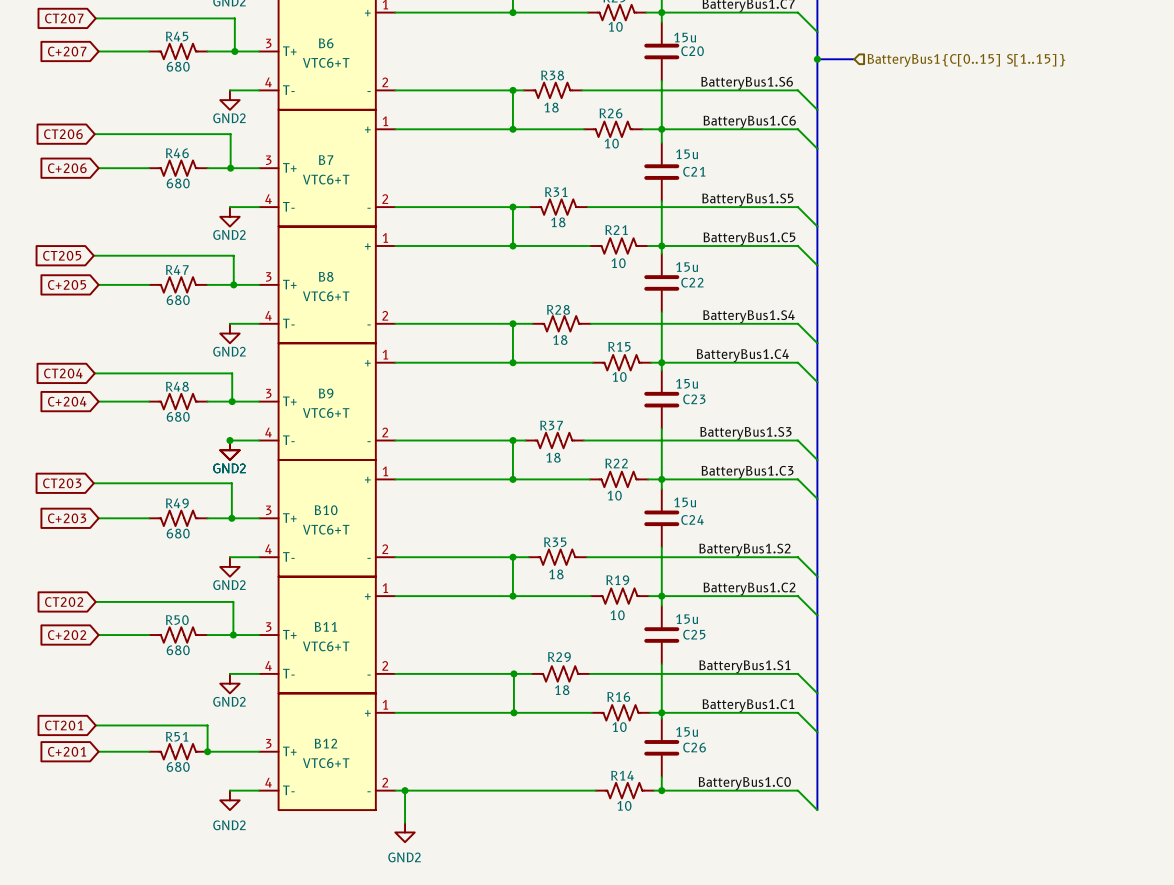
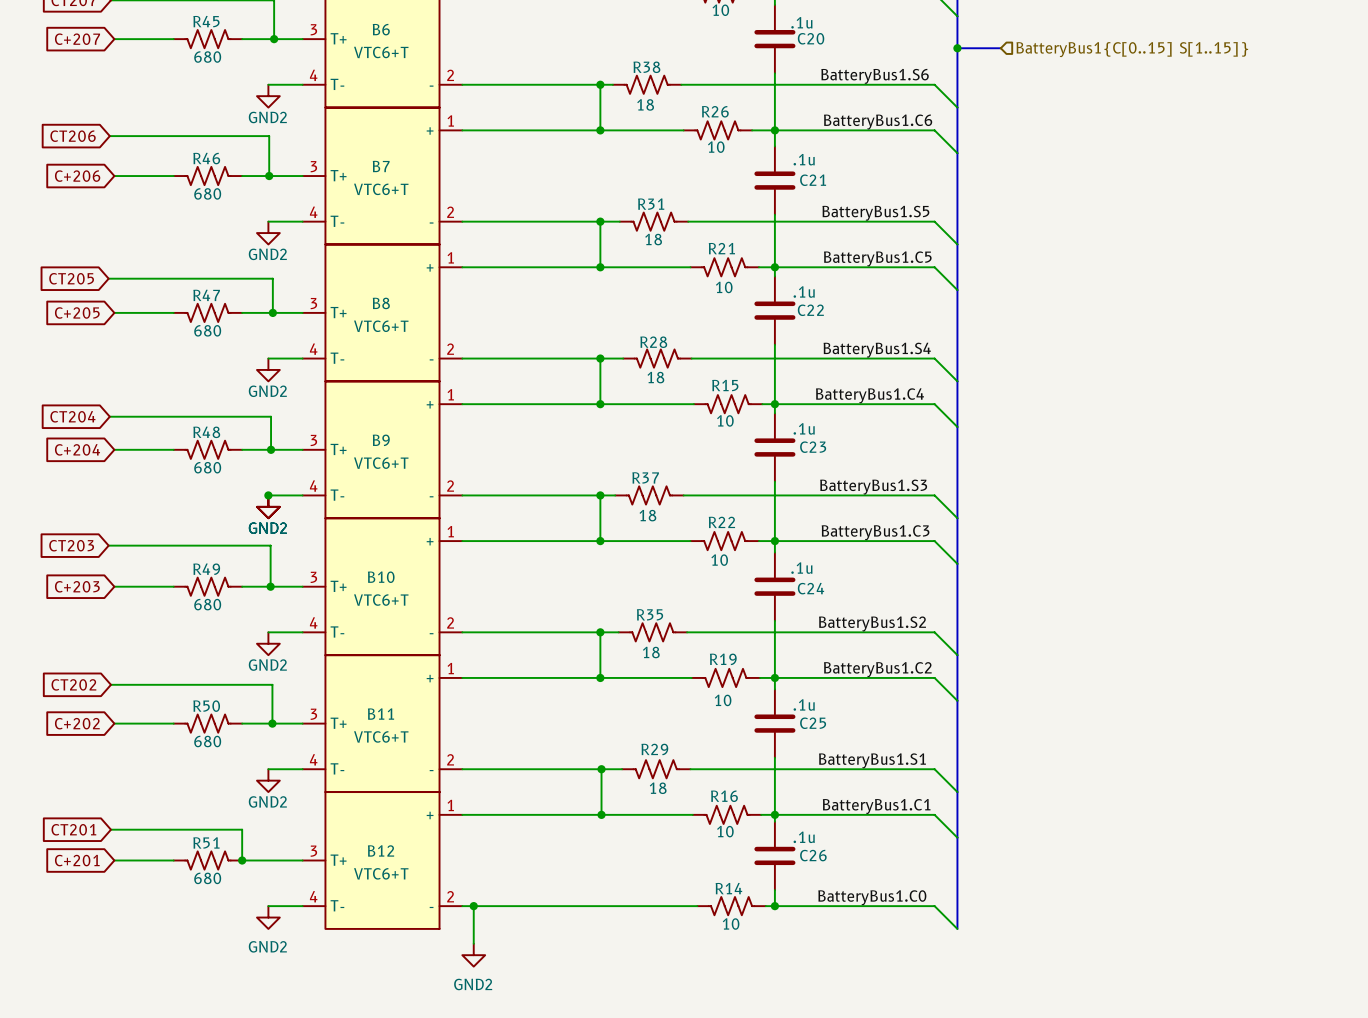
C20 value: 15u (685, 37) -> .1u (801, 22)
C21 value: 15u (687, 154) -> .1u (804, 159)
C22 value: 15u (687, 267) -> .1u (804, 292)
C23 value: 15u (687, 383) -> .1u (804, 428)
C24 value: 15u (685, 502) -> .1u (801, 568)
C25 value: 15u (687, 619) -> .1u (804, 704)
C26 value: 15u (687, 731) -> .1u (804, 837)

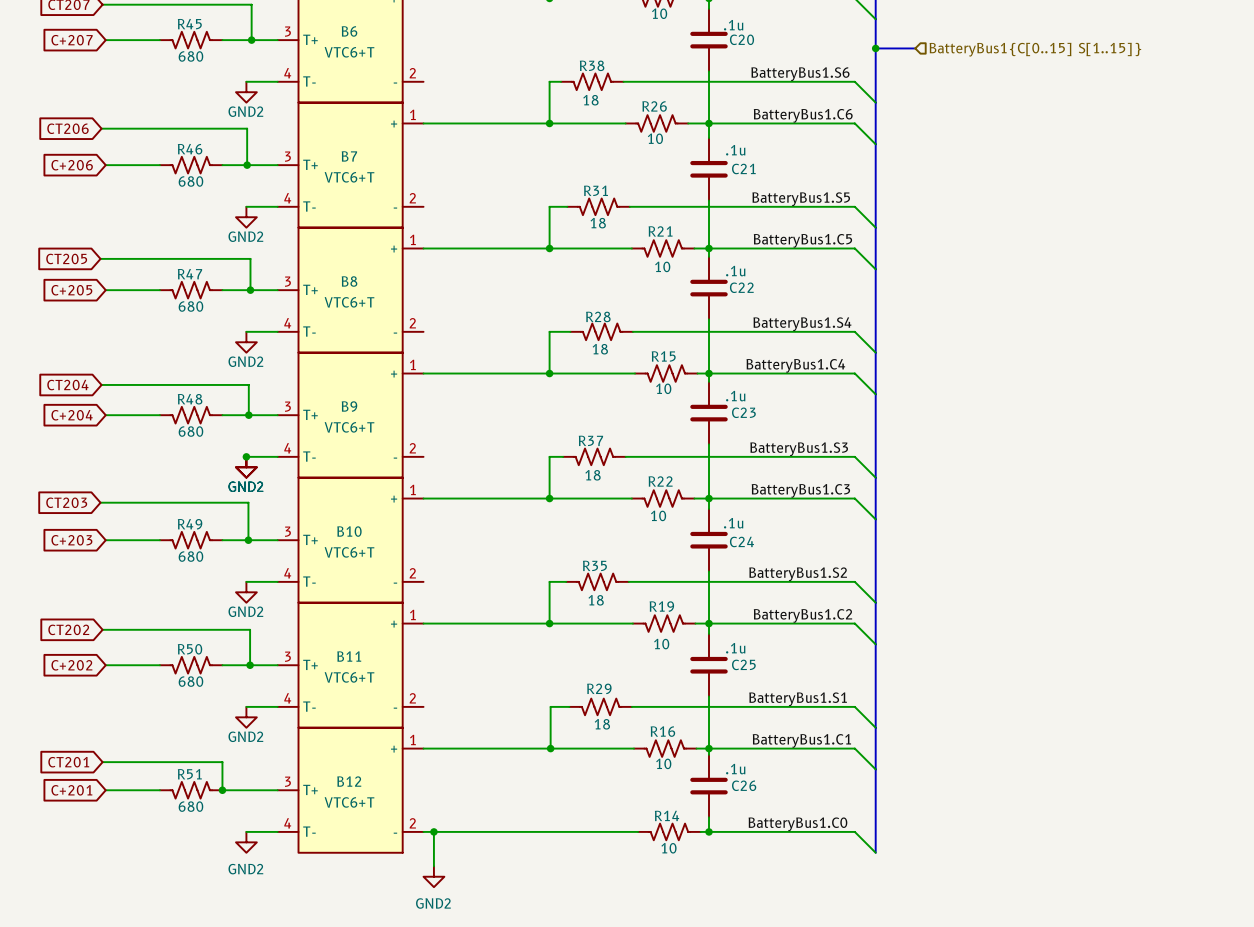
wire: (462, 84) (600, 84) -> none
junction: (600, 84) -> none
wire: (462, 221) (600, 221) -> none
junction: (600, 221) -> none
wire: (462, 358) (600, 358) -> none
junction: (600, 358) -> none
wire: (462, 495) (600, 495) -> none
junction: (600, 495) -> none
wire: (462, 632) (600, 632) -> none
junction: (600, 632) -> none
wire: (462, 769) (601, 769) -> none
junction: (601, 769) -> none

